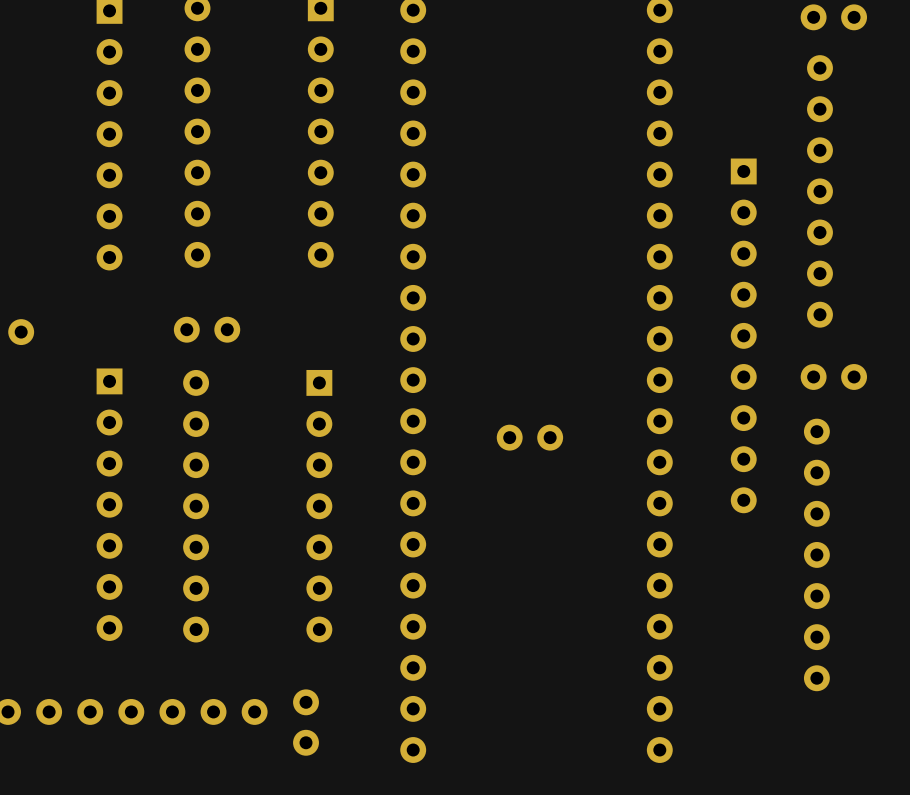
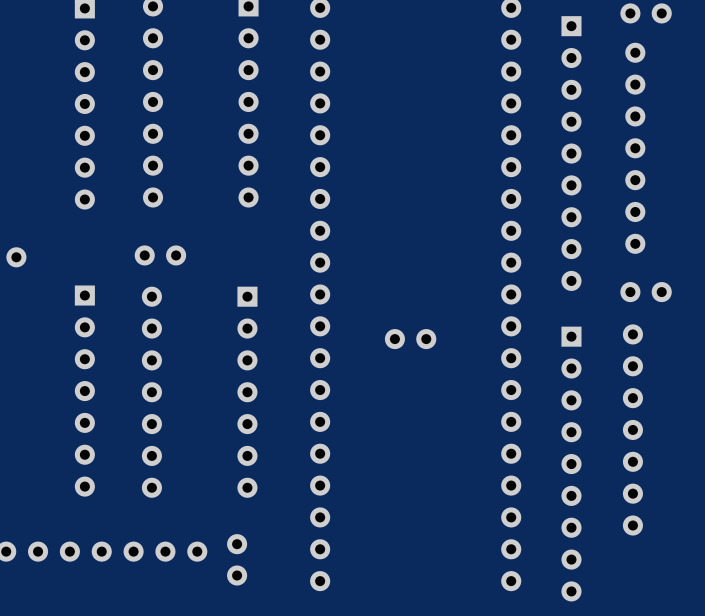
part: none -> (571, 153)
part: (743, 335) -> none
part: none -> (571, 464)

